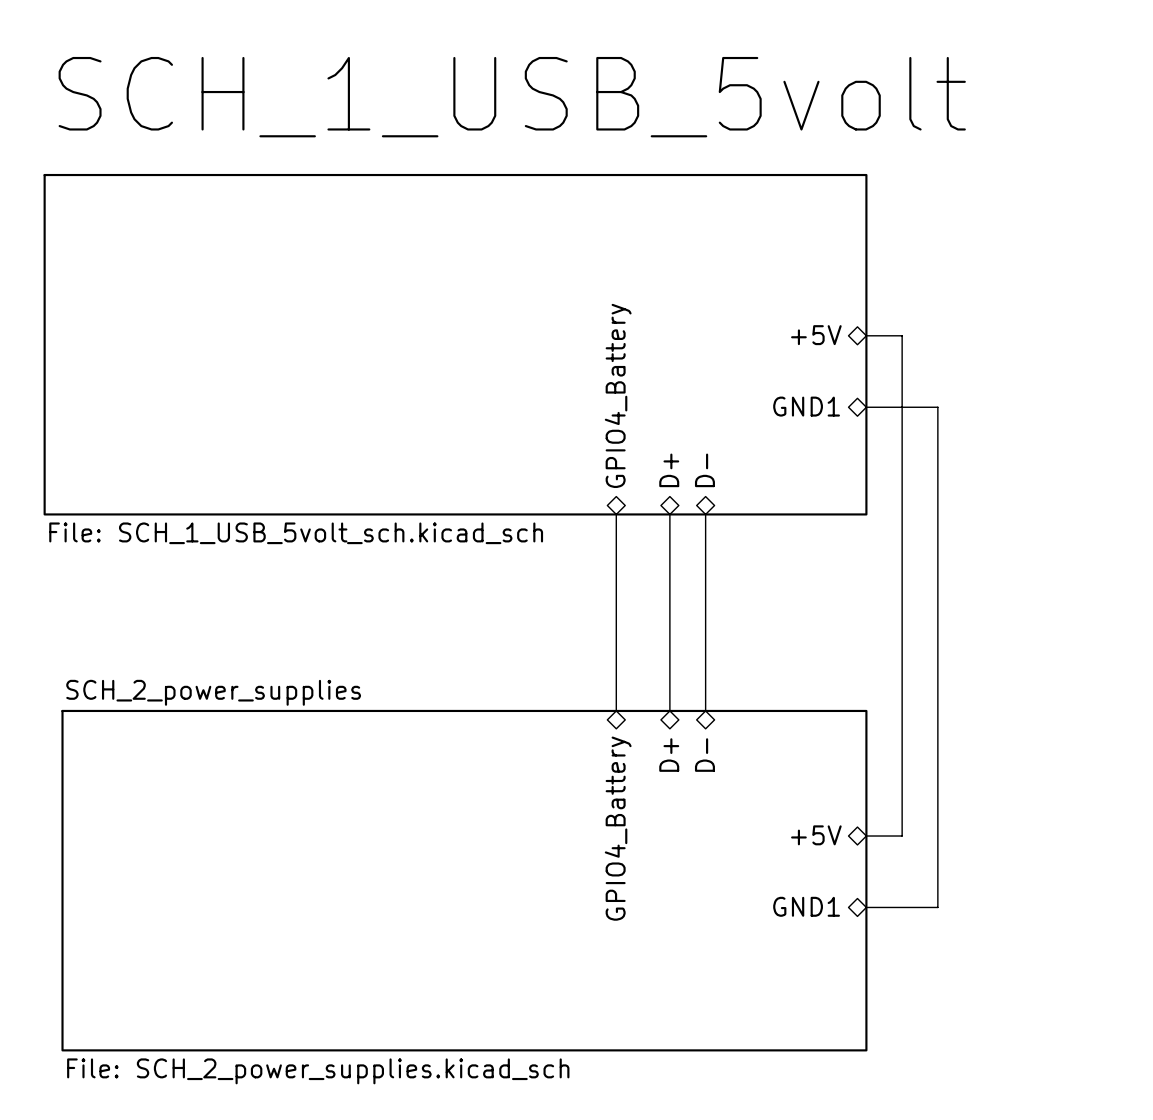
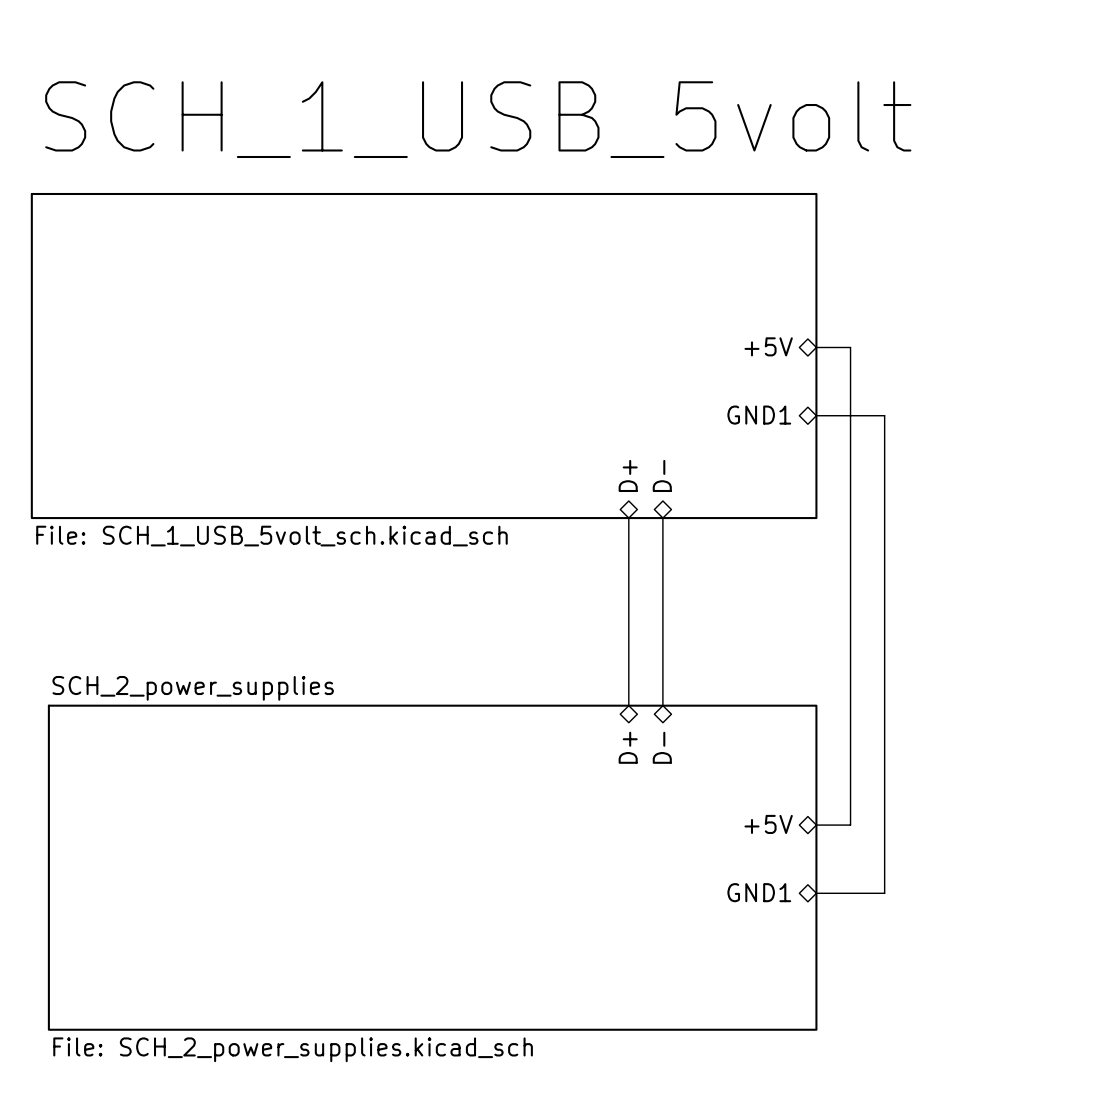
sheet pin: GPIO4_Battery (618, 395) -> none
wire: (616, 514) (616, 710) -> none
sheet pin: GPIO4_Battery (618, 828) -> none

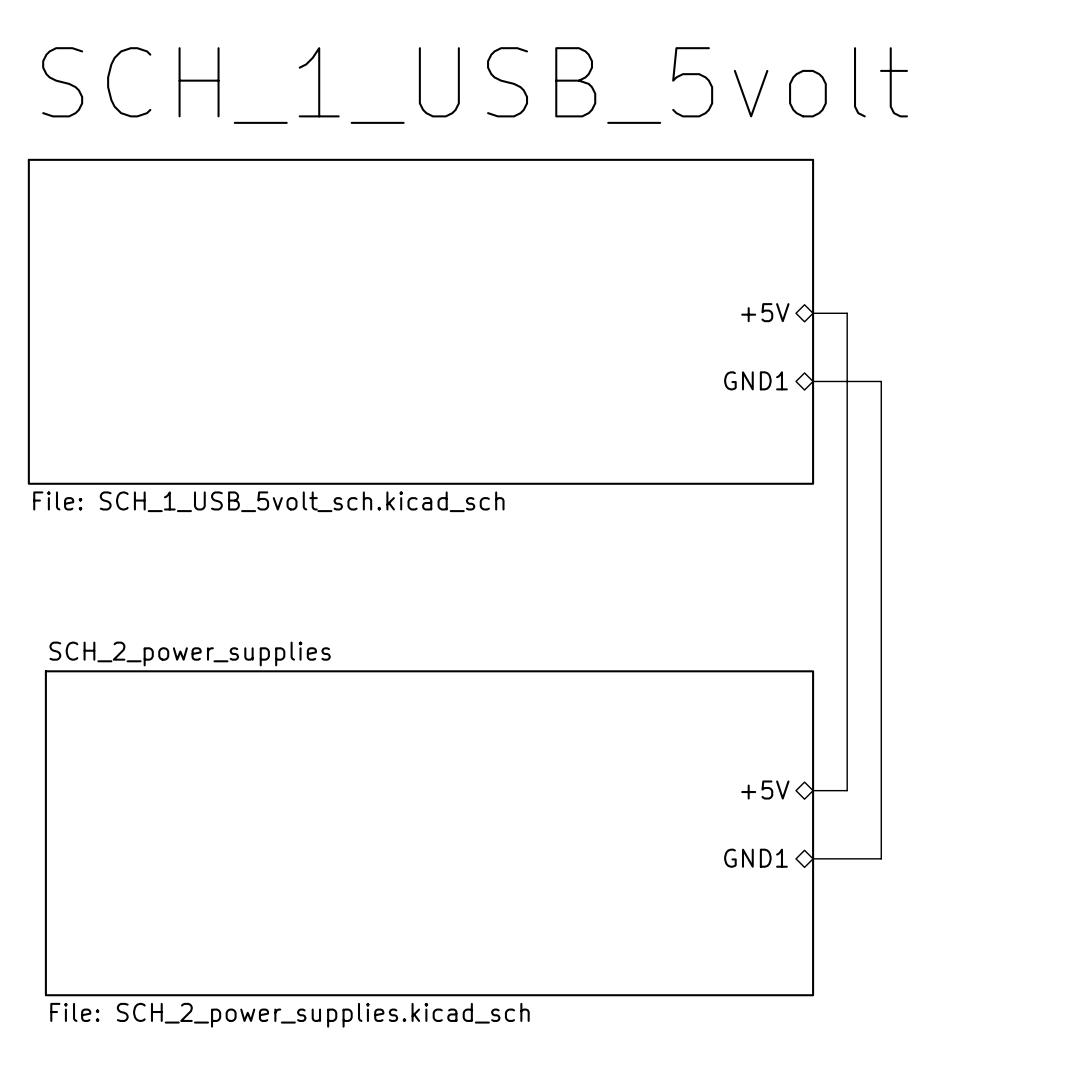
sheet pin: D+ (628, 475) -> none
sheet pin: D- (662, 475) -> none
wire: (628, 518) (628, 705) -> none
wire: (662, 518) (662, 705) -> none
sheet pin: D+ (628, 747) -> none
sheet pin: D- (662, 747) -> none

